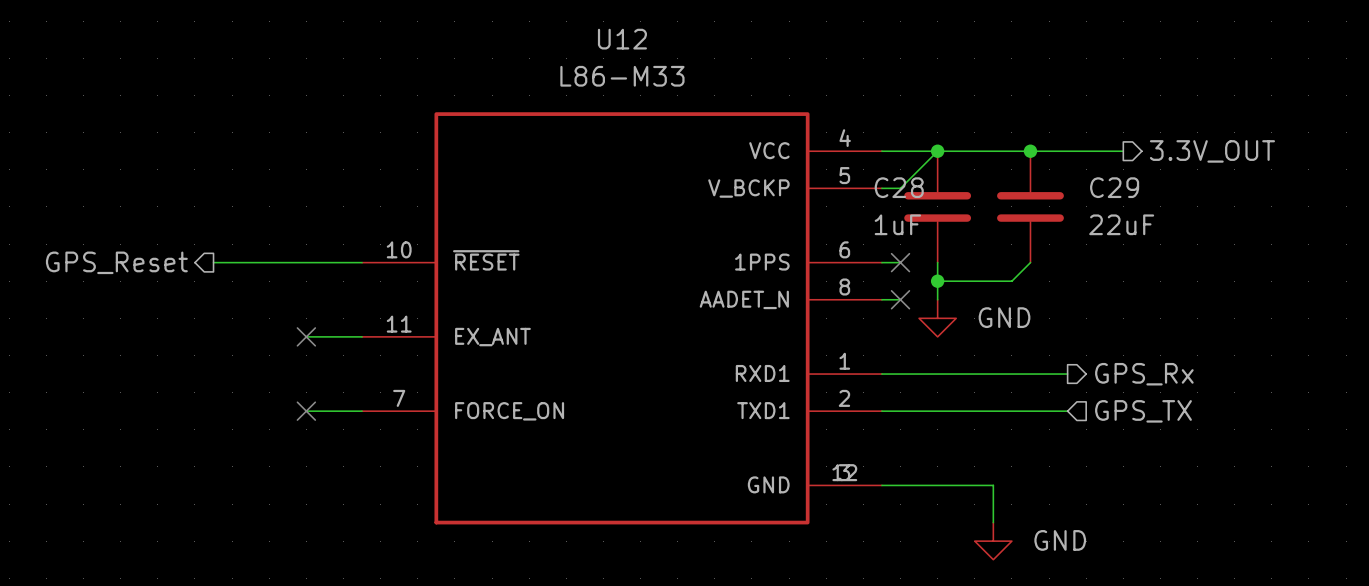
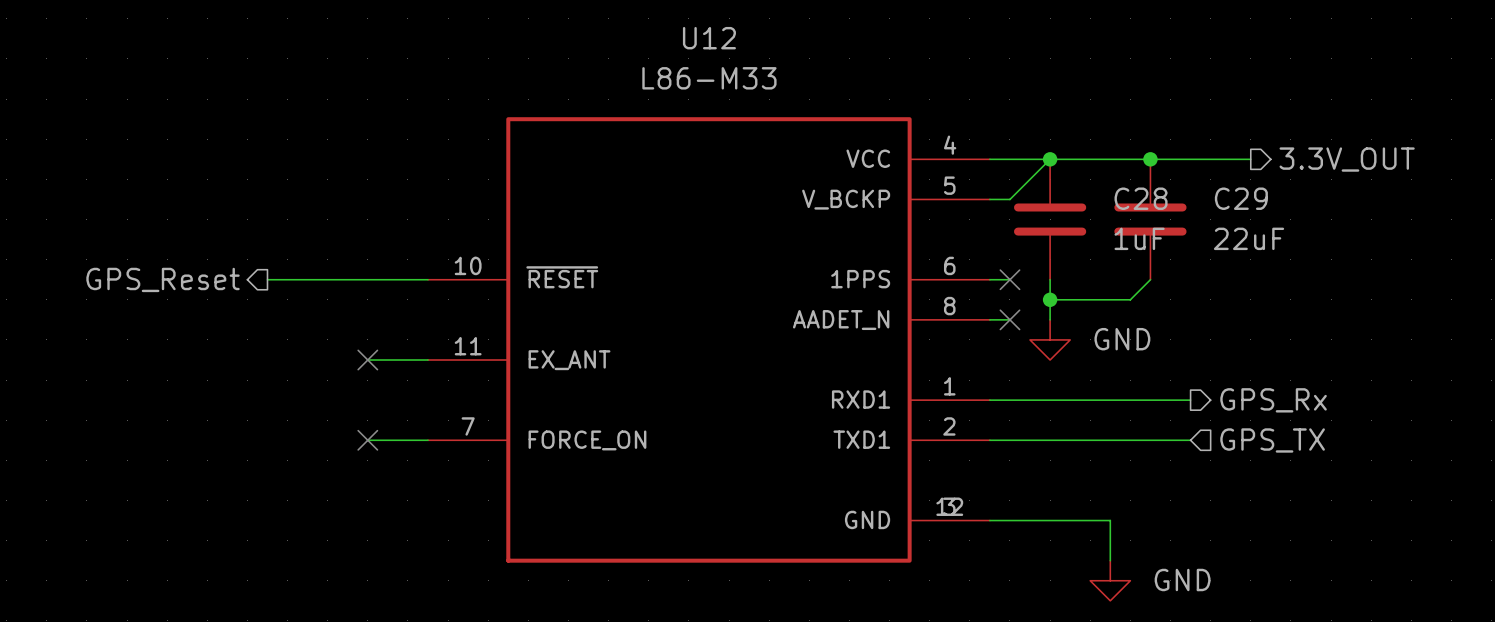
C28 name position: C28 (899, 187) -> C28 (1141, 198)
C28 value position: 1uF (897, 224) -> 1uF (1139, 238)

